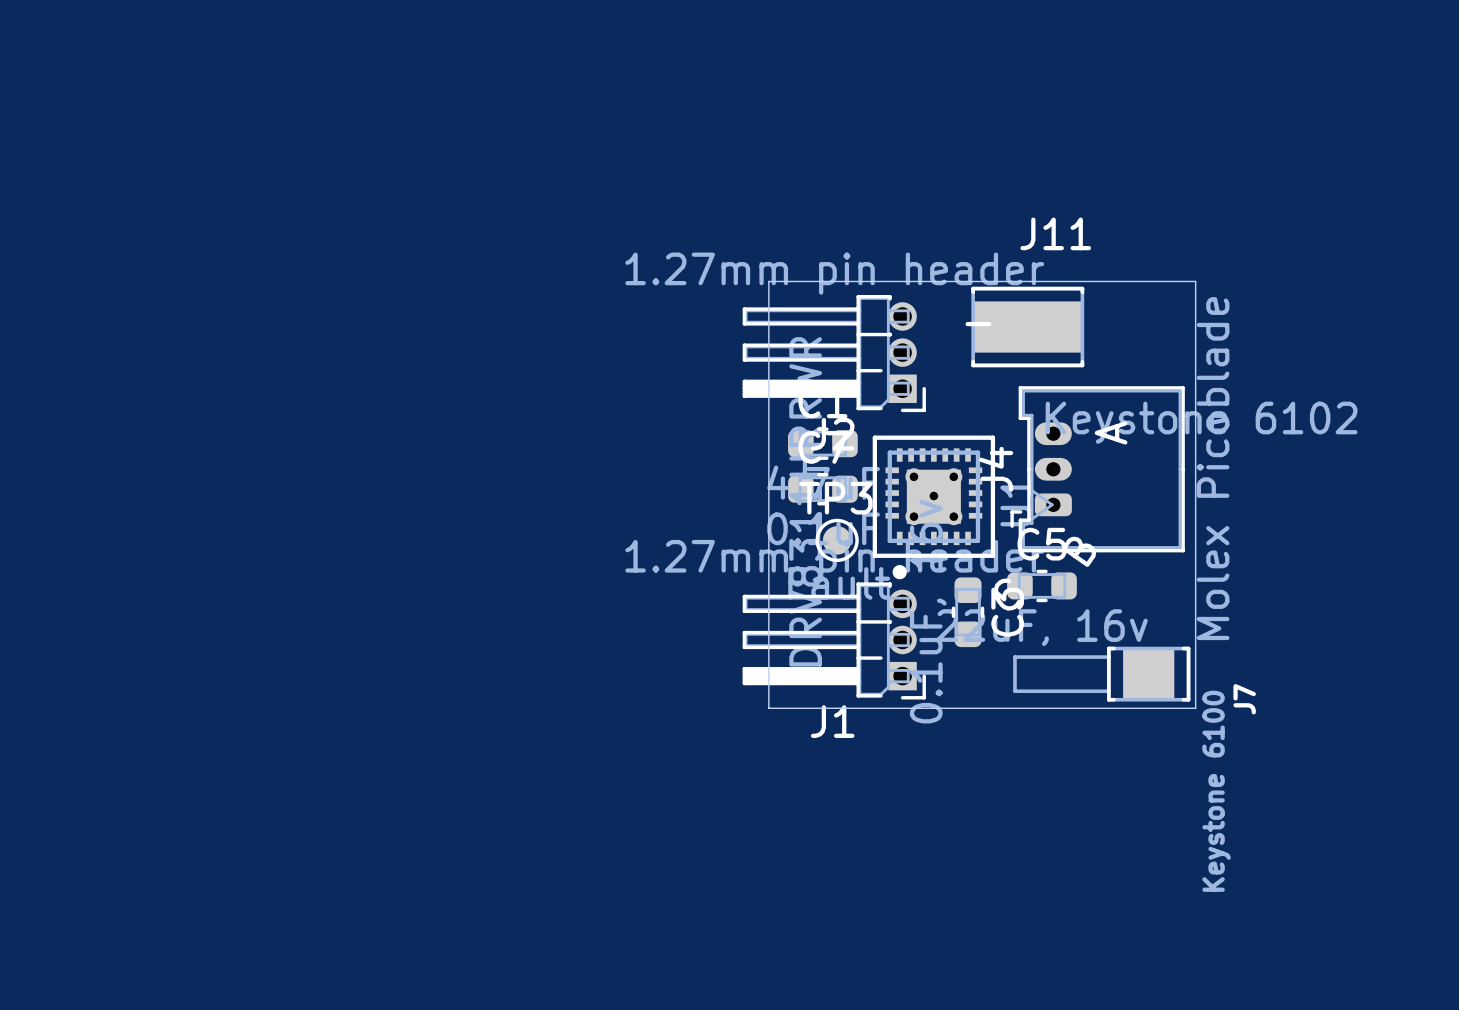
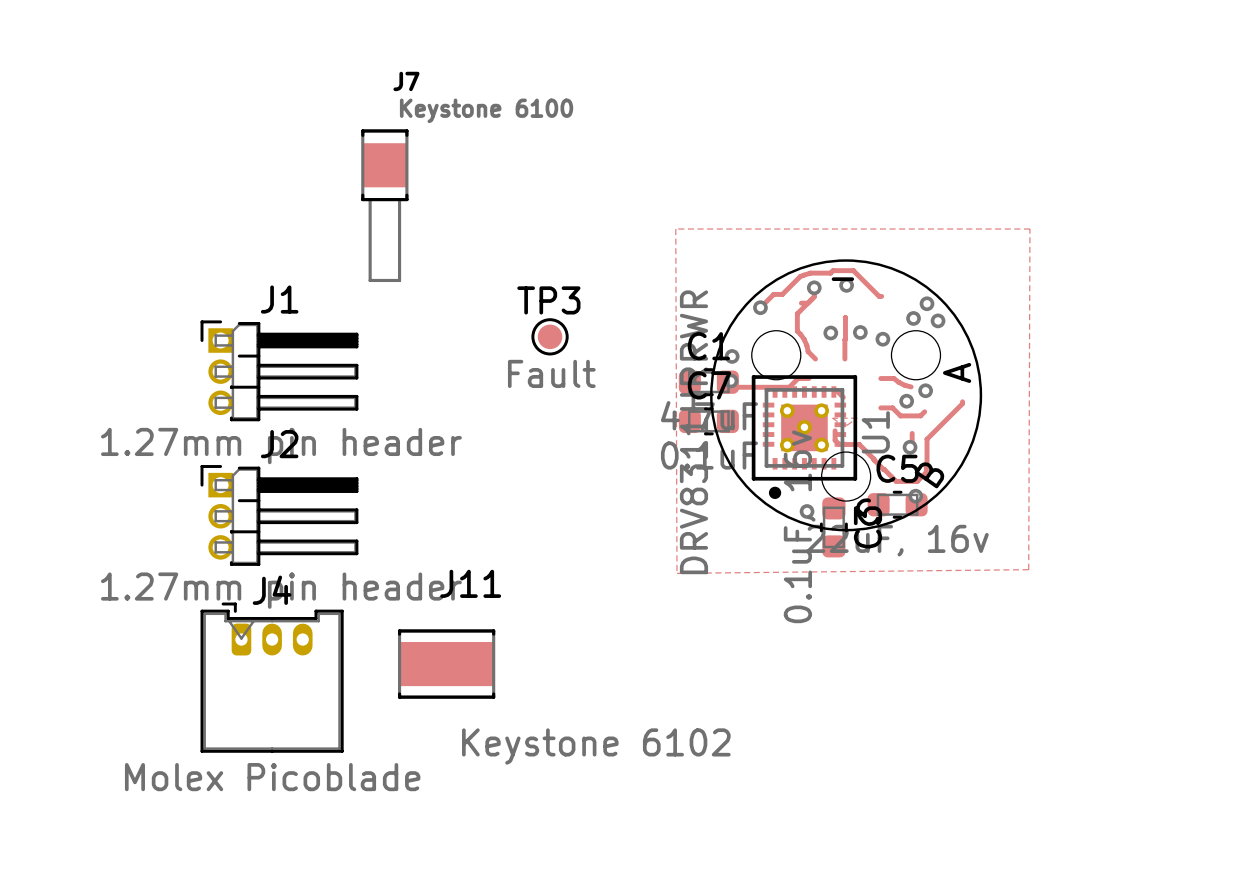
zone outline: none -> (675, 229) (1029, 229) (1028, 569) (677, 573) (675, 229)
board edge: (768, 281) (1195, 281) (1195, 708) (768, 708) (768, 281) -> none
round board edge: none -> [710, 259, 983, 532]
J11 position: (1027, 327) -> (446, 664)
via: none -> (846, 285)
track: none -> (814, 287) (814, 296) (797, 313) (797, 331) (804, 339) (808, 351) (815, 359)
via: none -> (814, 287)
track: none -> (881, 296) (879, 296) (853, 270) (833, 270) (830, 273) (810, 273) (800, 276) (782, 294) (773, 294) (760, 307)
track: none -> (801, 303) (808, 303)
via: none -> (927, 303)
J2 rotation: 0° (834, 353) -> 180° (279, 515)
J2 position: (834, 353) -> (279, 515)
via: none -> (760, 307)
track: none -> (845, 317) (844, 359)
via: none -> (913, 318)
via: none -> (938, 320)
round board edge: none -> [751, 330, 802, 381]
round board edge: none -> [890, 330, 942, 381]
via: none -> (860, 332)
via: none -> (830, 332)
via: none -> (882, 339)
via: none -> (732, 356)
track: none -> (808, 378) (798, 378) (789, 387) (737, 387) (730, 380)
track: none -> (880, 378) (893, 378) (911, 386)
via: none -> (730, 380)
track: none -> (836, 390) (843, 397)
via: none -> (925, 390)
via: none -> (906, 401)
track: none -> (962, 401) (927, 439) (926, 472) (917, 481) (896, 481) (859, 444) (839, 444) (835, 440) (835, 430)
J4 rotation: 0° (1097, 469) -> 90° clockwise (272, 677)
J4 position: (1097, 469) -> (272, 677)
track: none -> (880, 407) (892, 407) (900, 415) (920, 415) (924, 411)
zone outline: none -> (832, 418) (857, 418) (847, 425) (842, 425) (832, 418)
track: none -> (912, 433) (912, 445) (910, 447)
via: none -> (910, 447)
round board edge: none -> [821, 451, 872, 502]
TP3 position: (837, 540) -> (550, 336)
via: none -> (915, 496)
via: none -> (807, 511)
J1 rotation: 0° (834, 640) -> 180° (279, 370)
J1 position: (834, 640) -> (279, 370)
J7 rotation: 0° (1101, 674) -> 90° counterclockwise (384, 205)
J7 position: (1101, 674) -> (384, 205)

